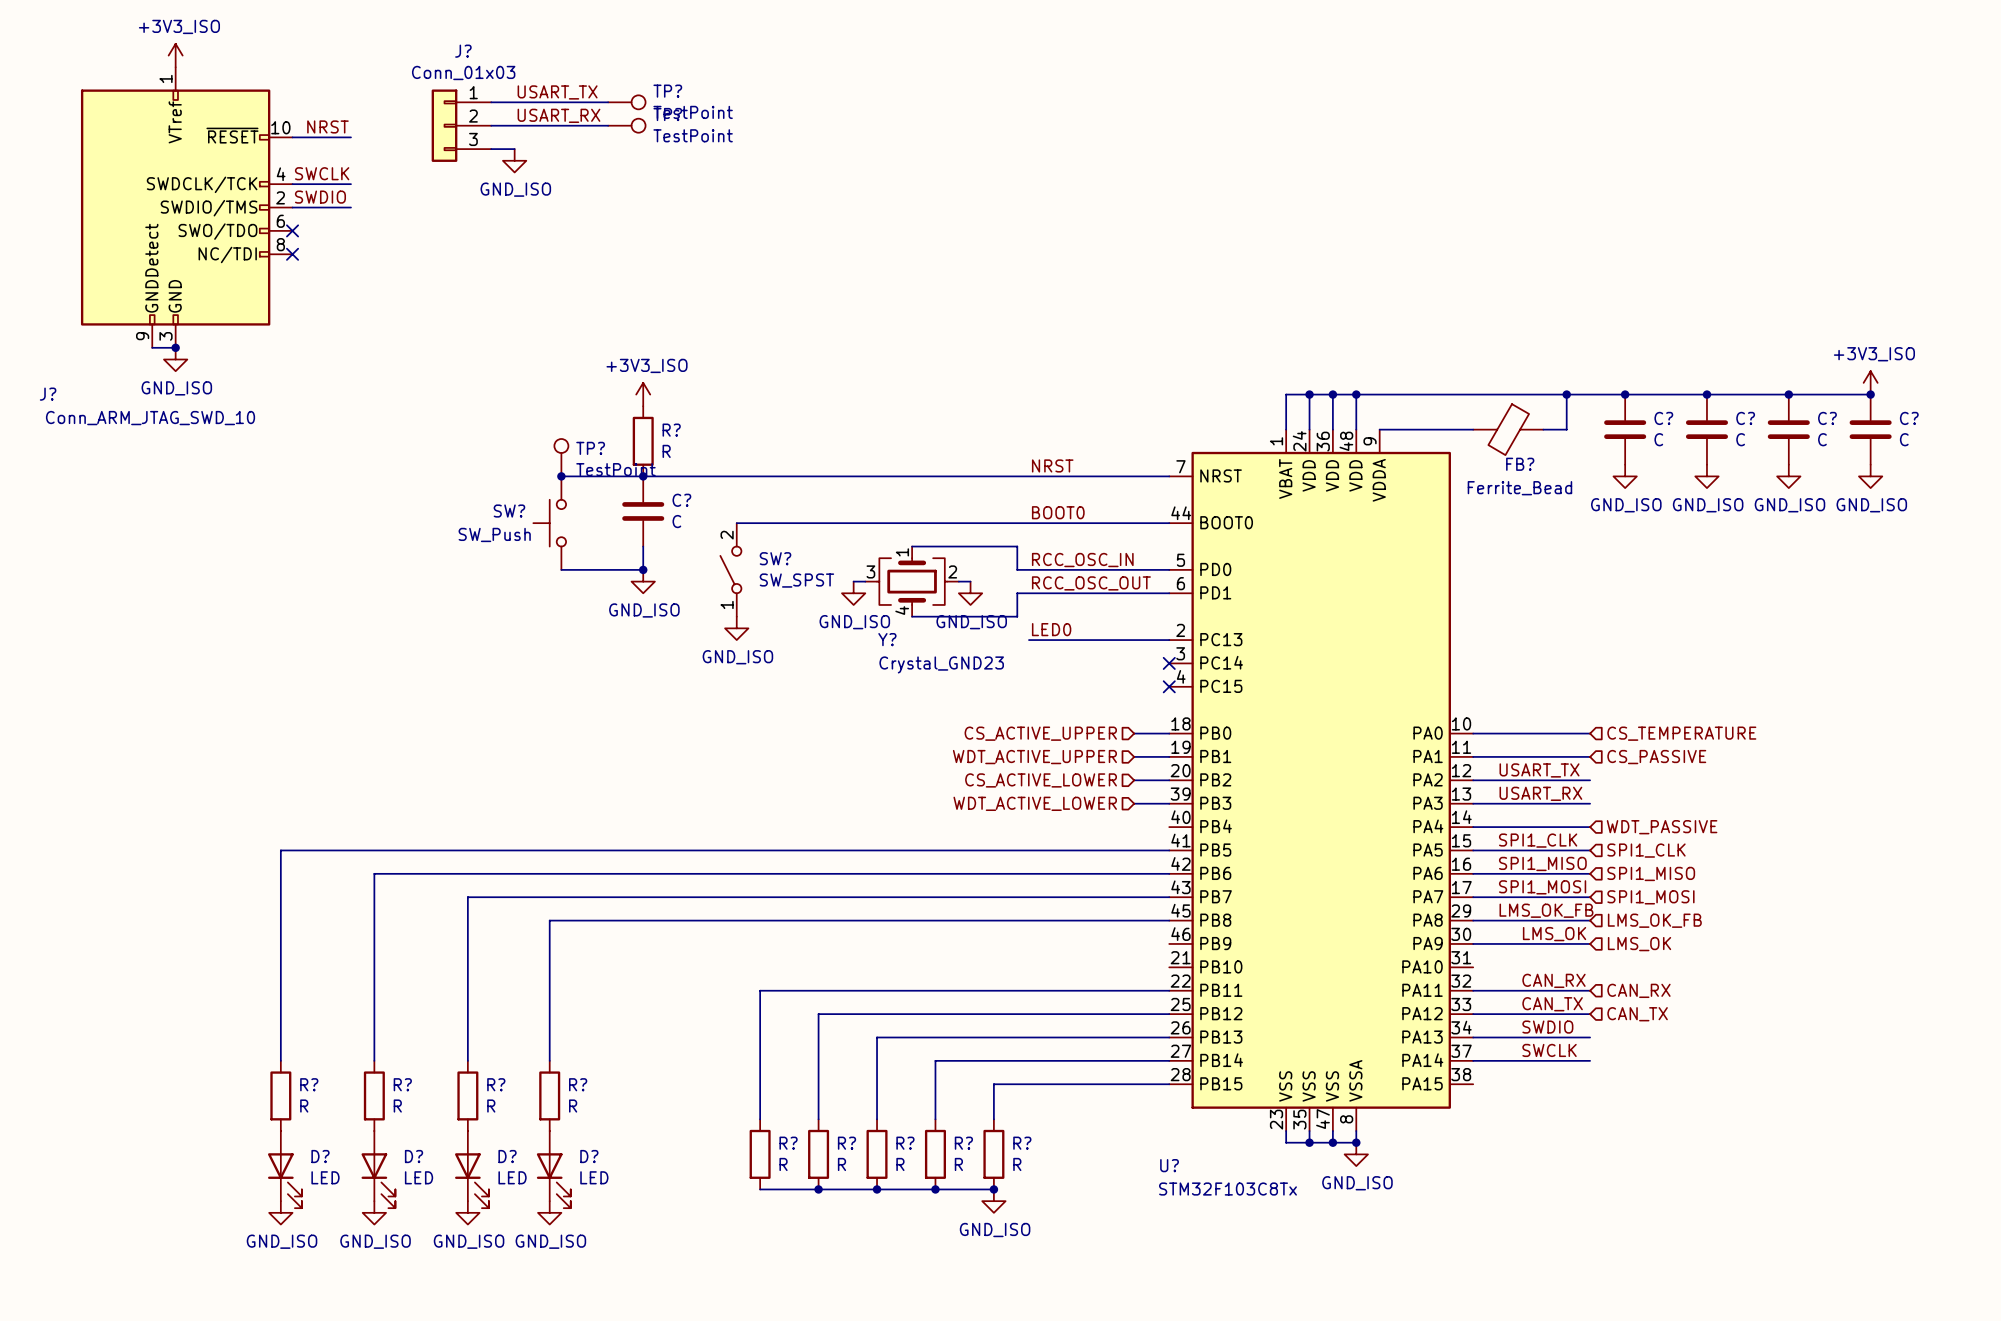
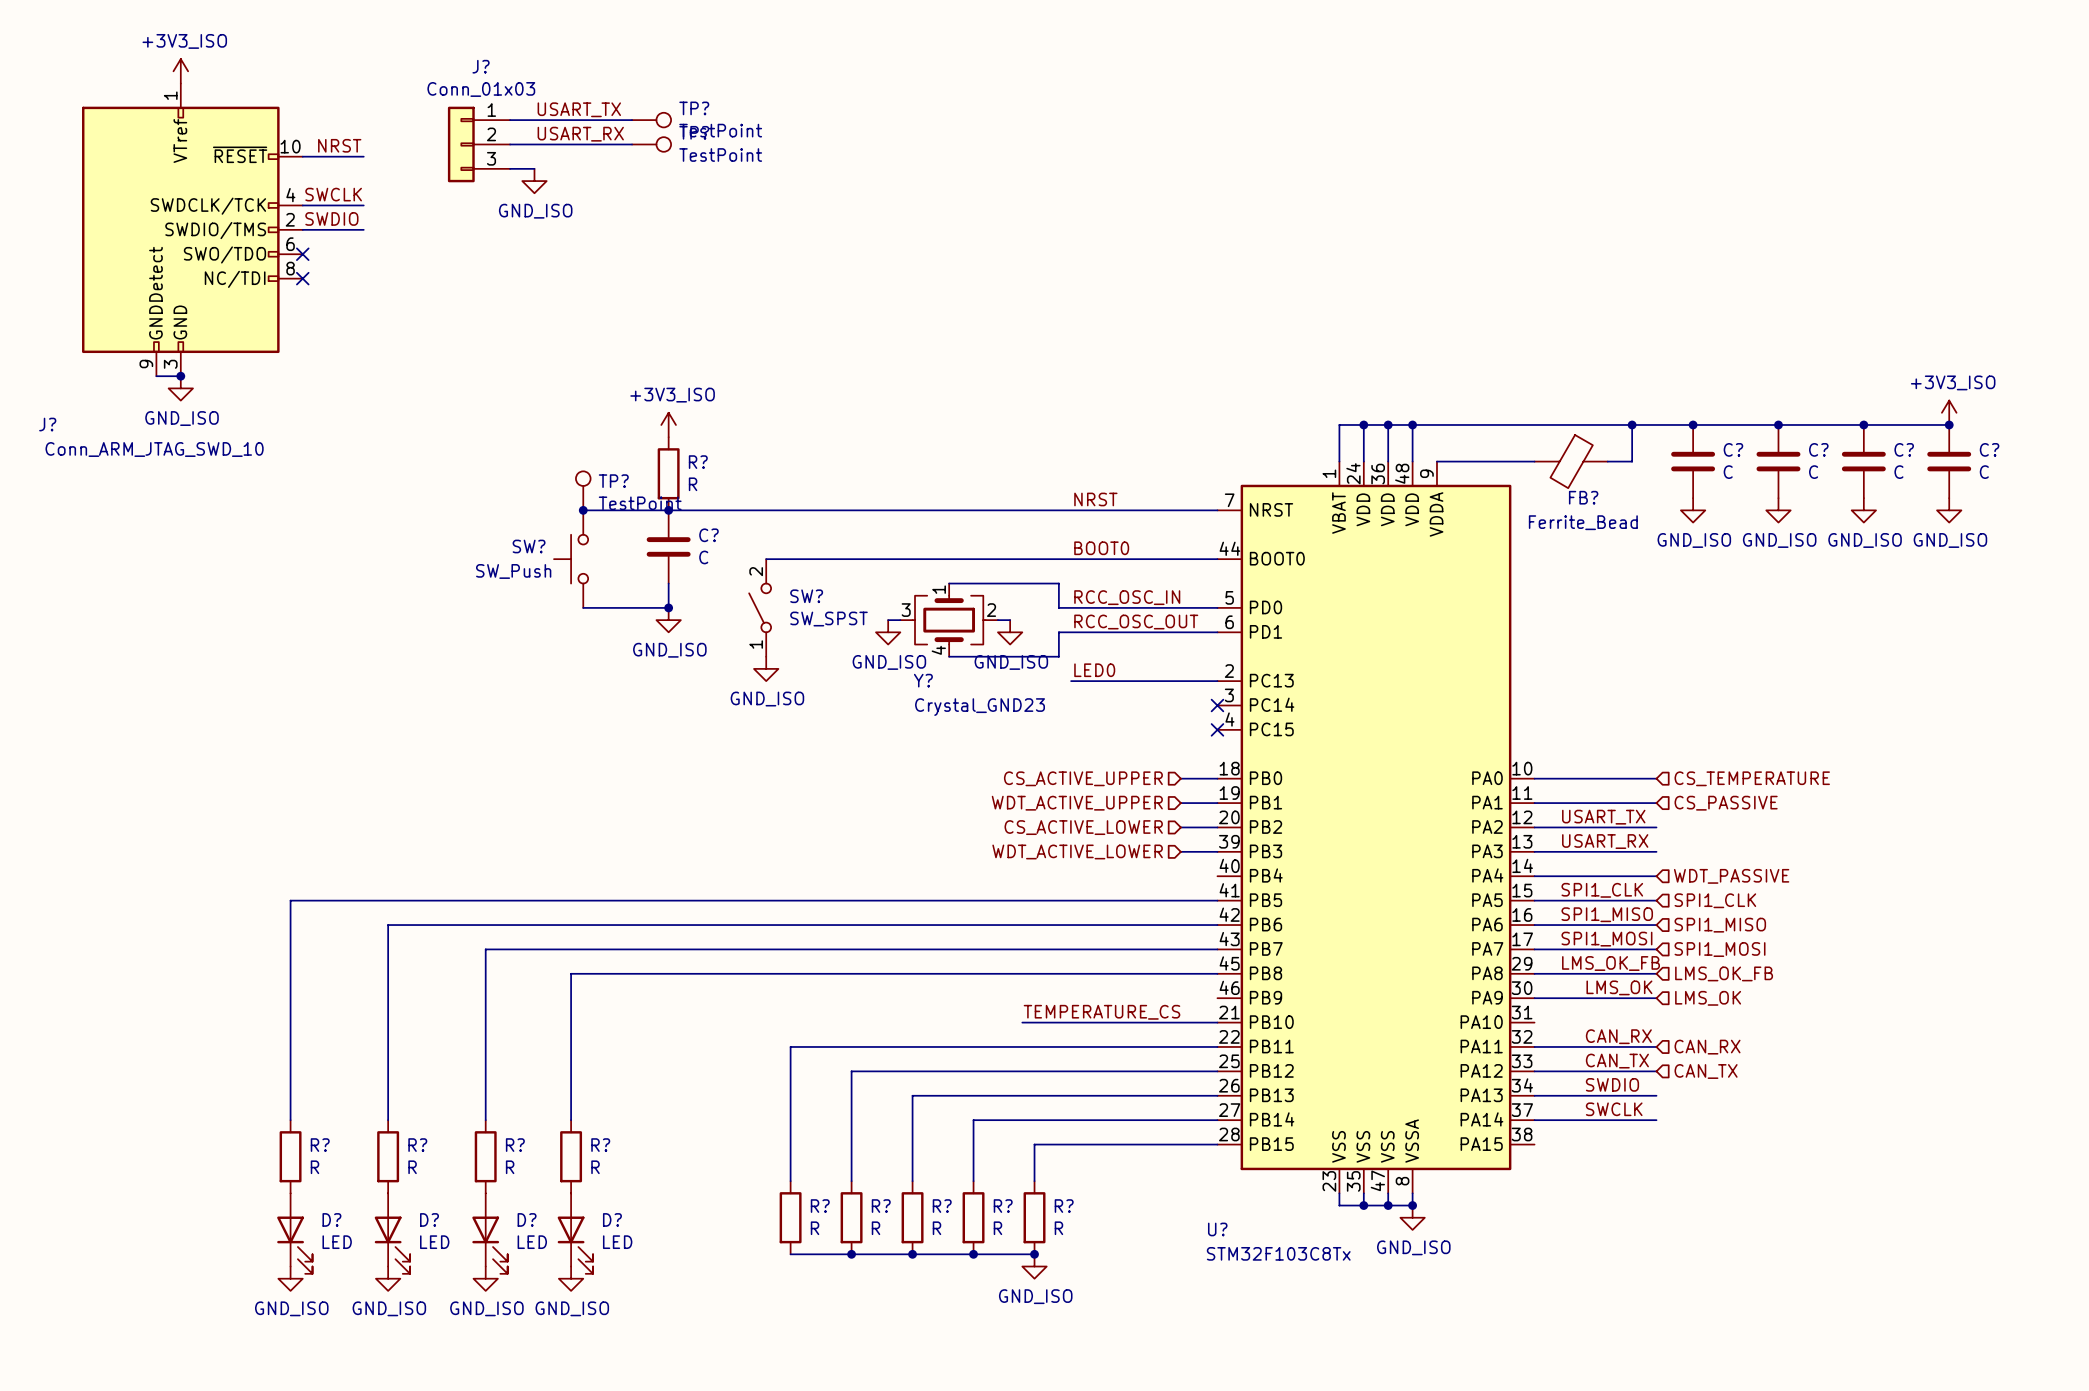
label: none -> TEMPERATURE_CS (1101, 1012)
wire: none -> (1022, 1022) (1217, 1022)

